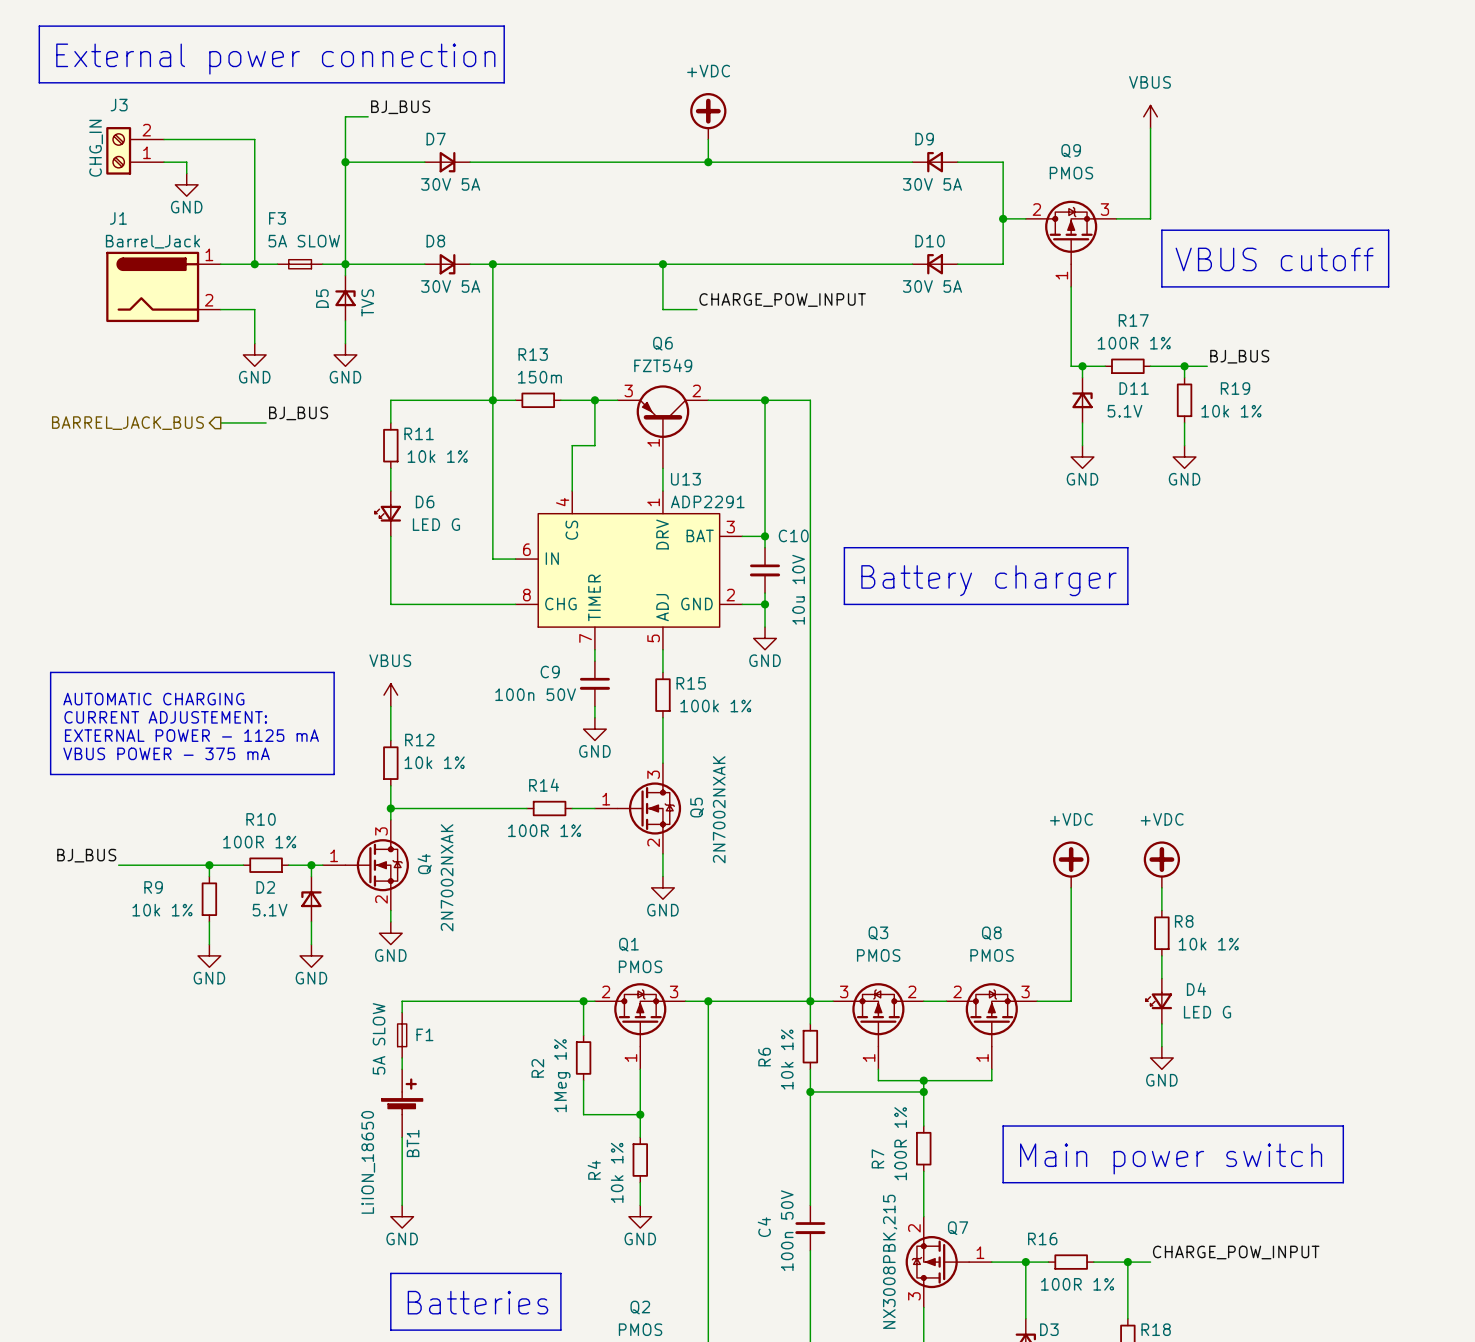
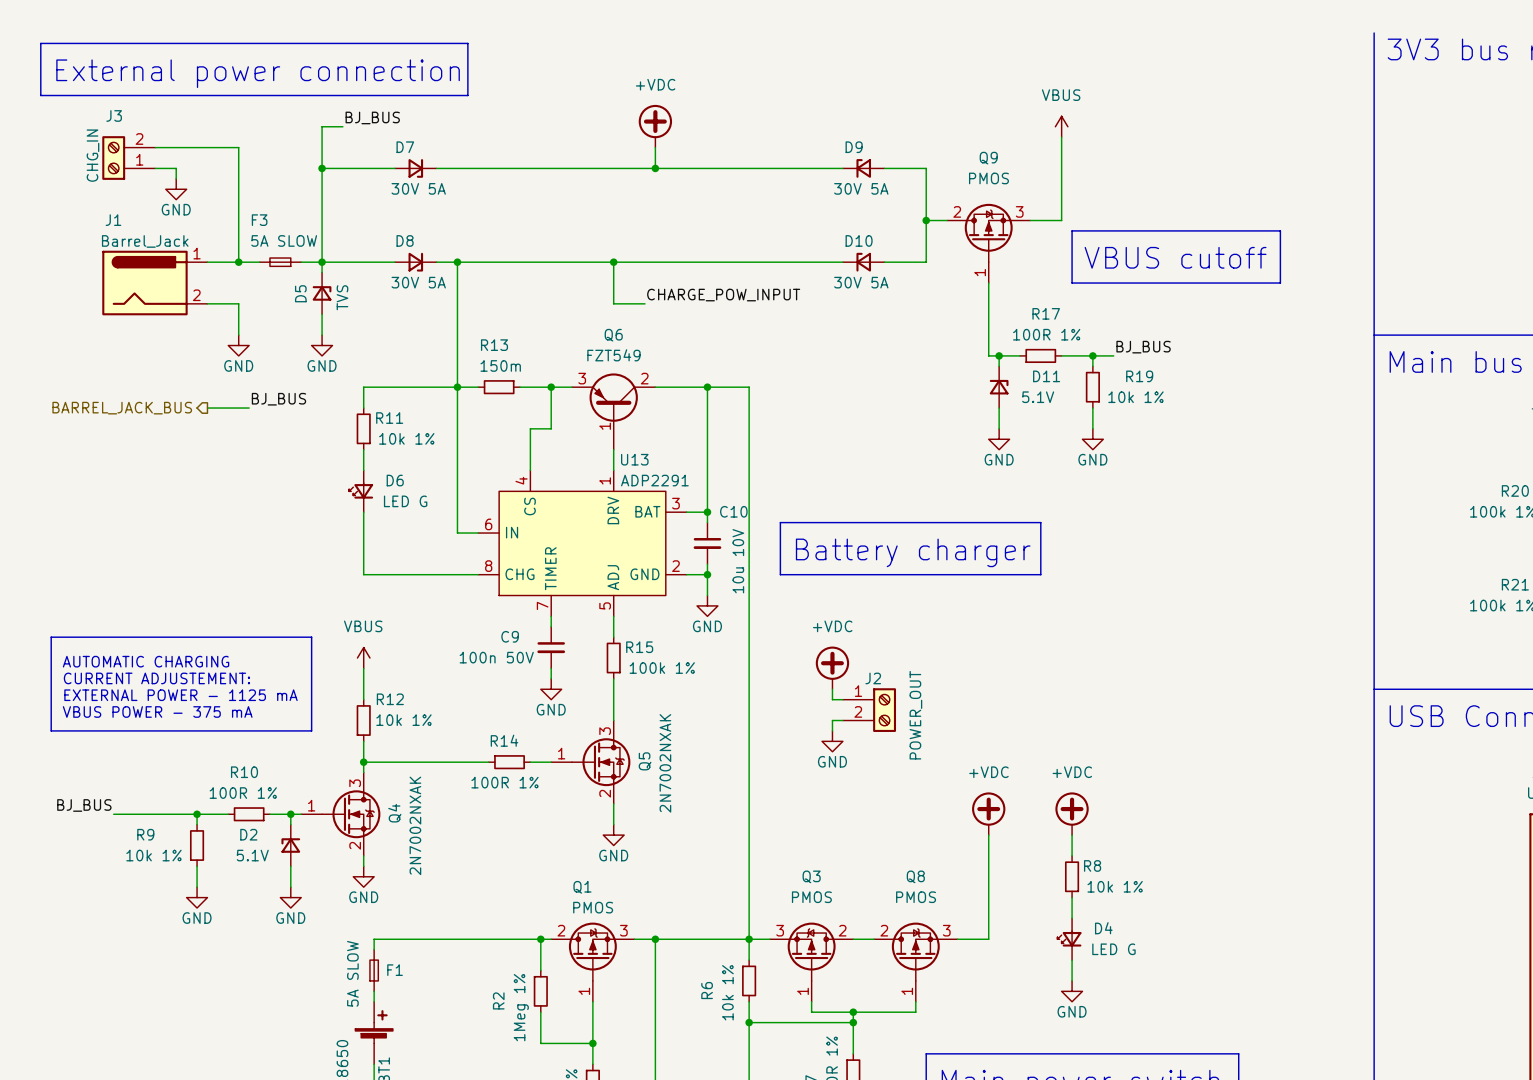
power symbol: none -> +VDC (832, 667)
wire: none -> (832, 689) (832, 699) (842, 699)
J2: none -> POWER_OUT (869, 710)
wire: none -> (842, 720) (832, 720) (832, 730)
power symbol: none -> GND (832, 741)

